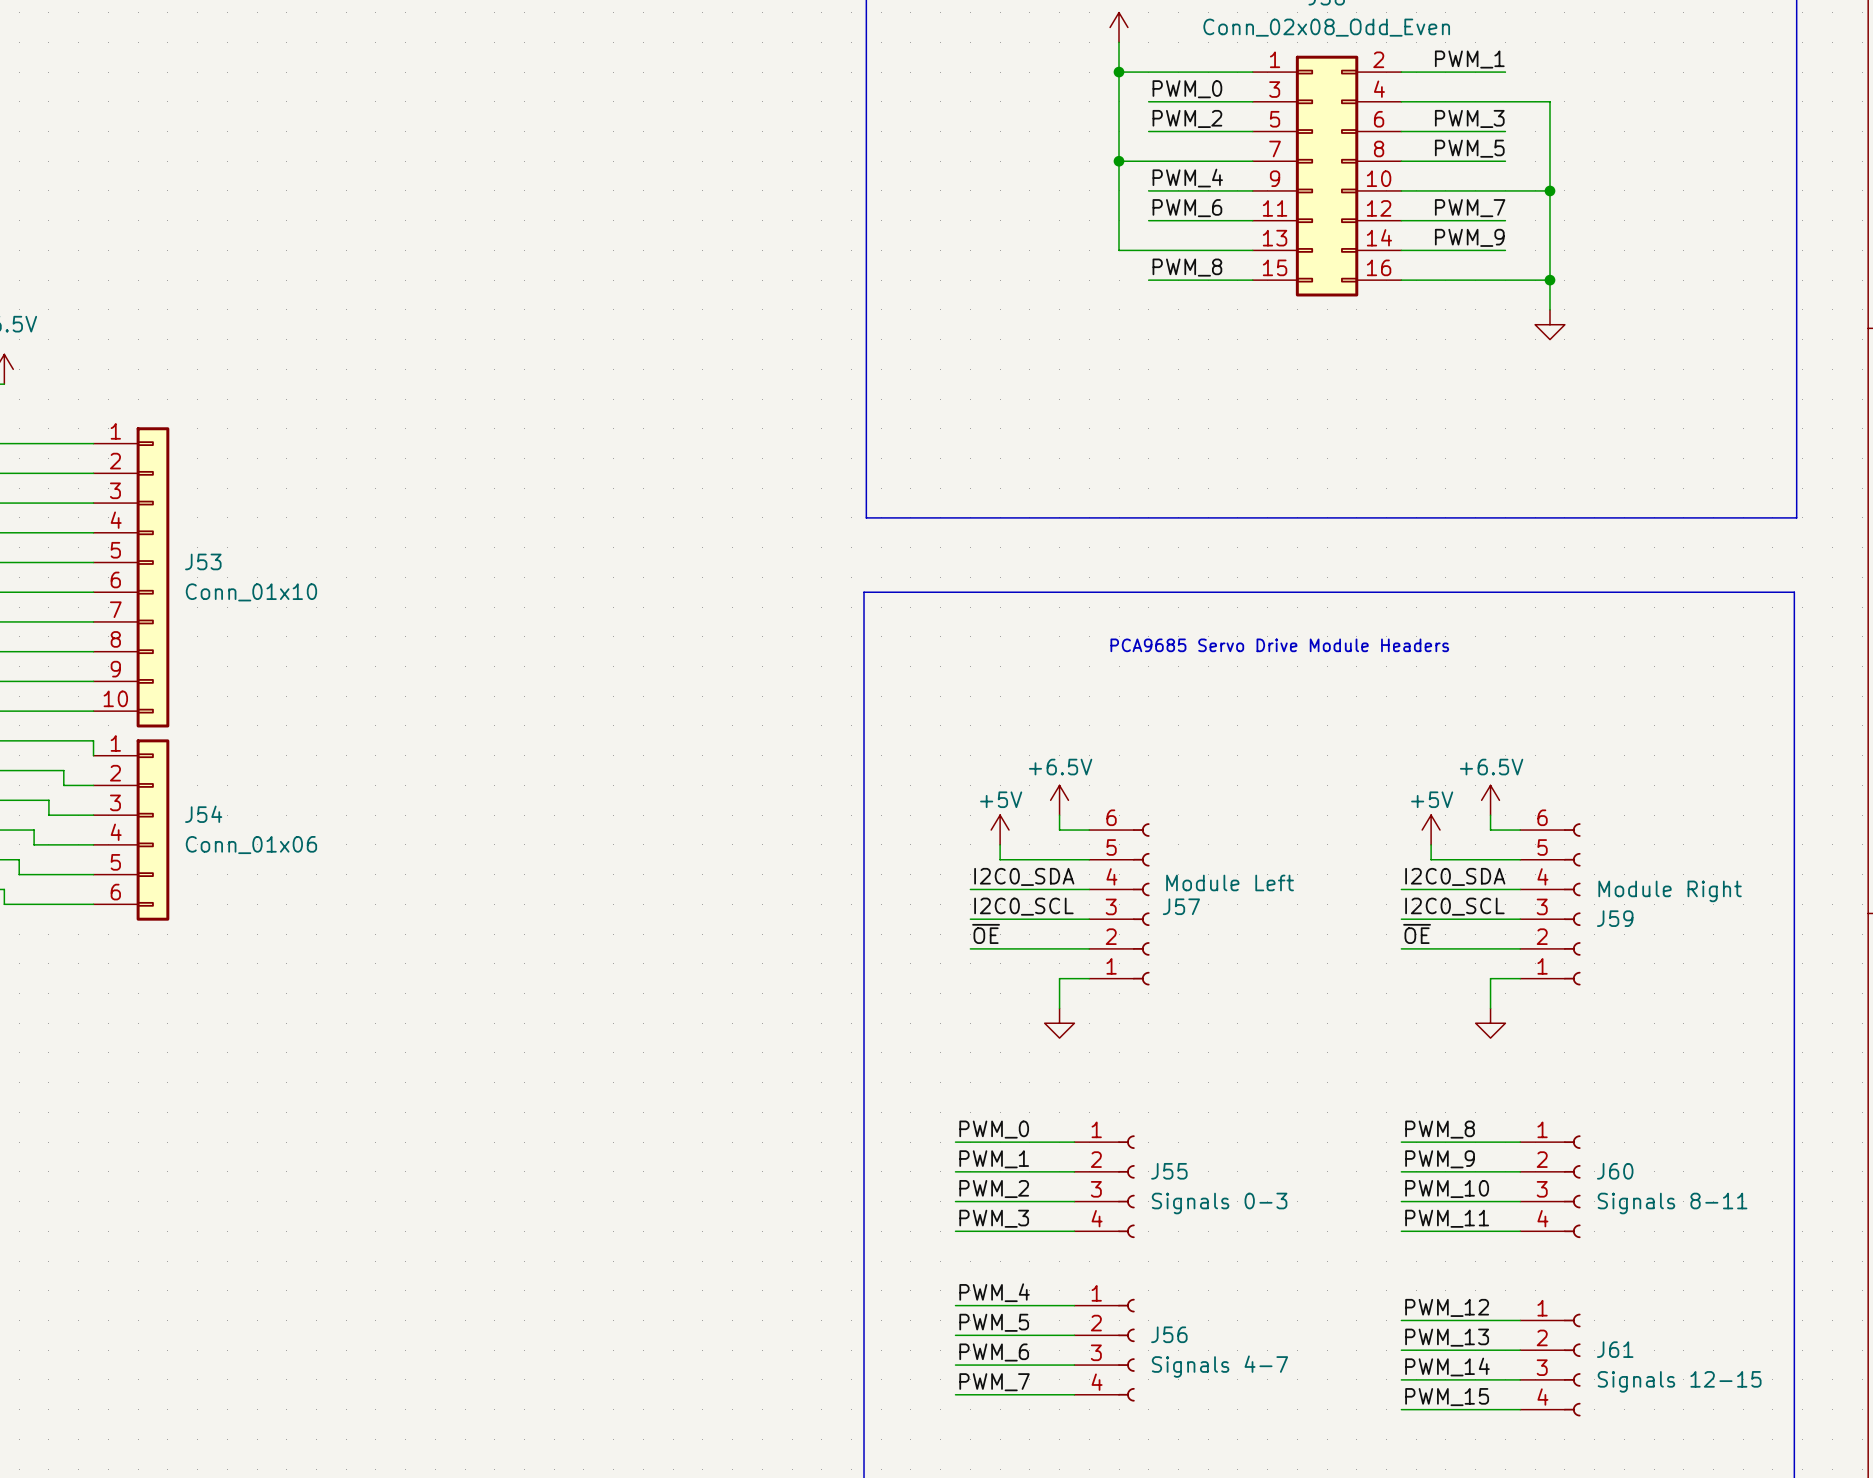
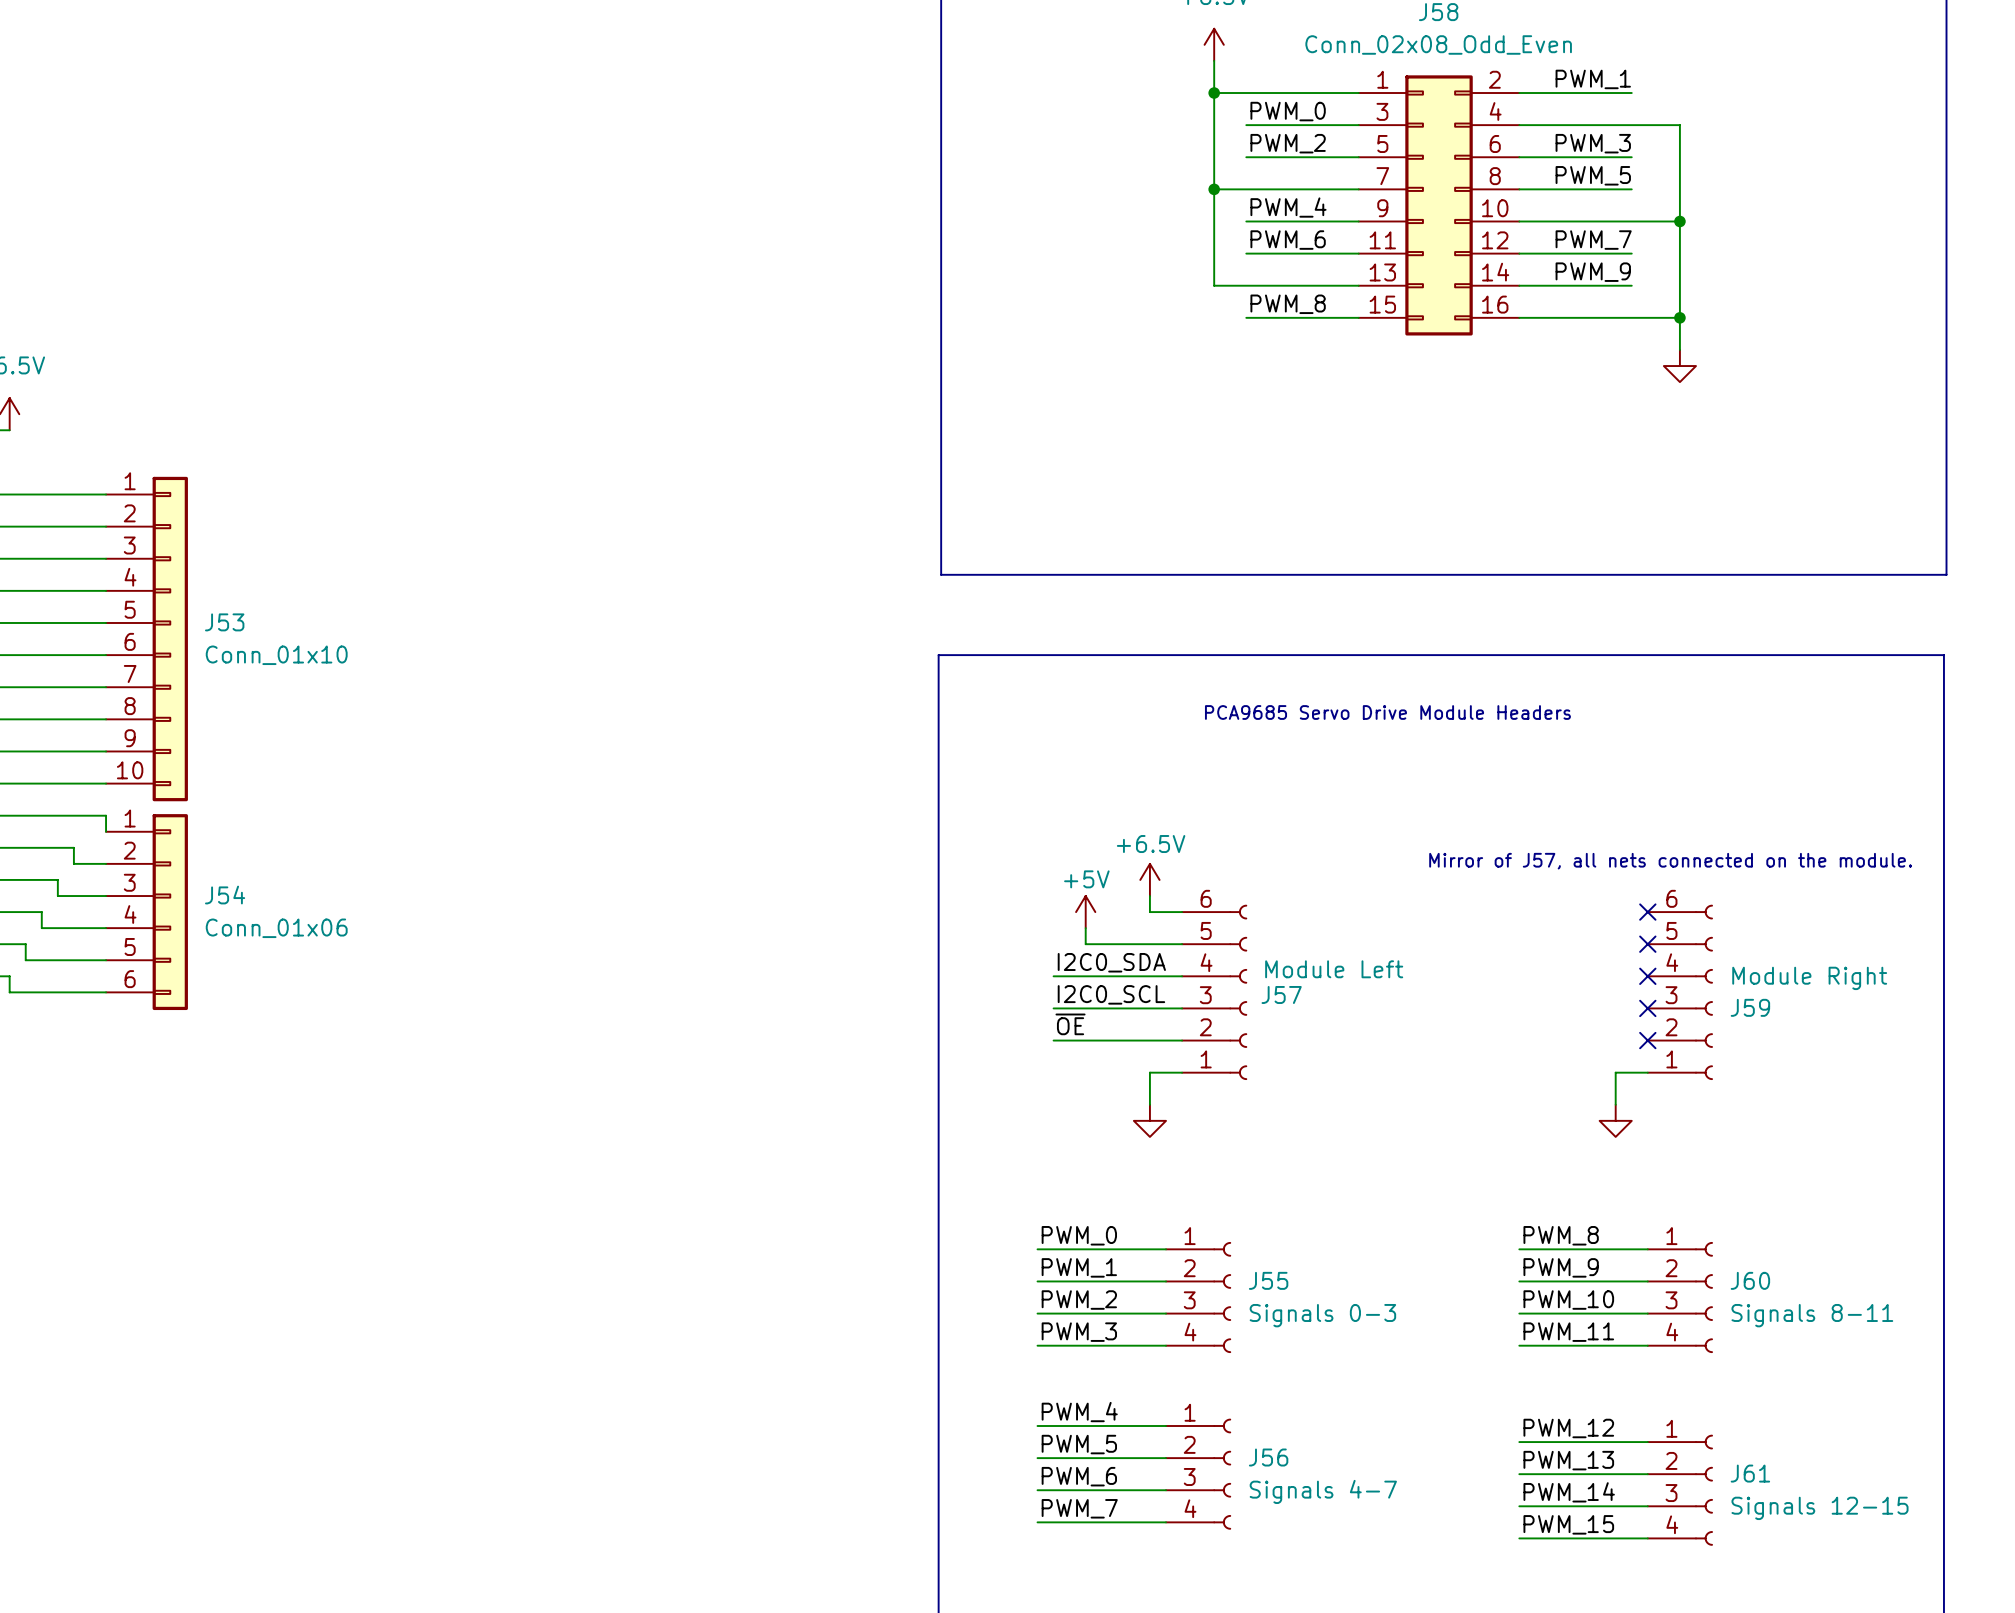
text: none -> Mirror of J57, all nets connected on the module. (1670, 861)
power symbol: +6.5V (1490, 800) -> none
wire: (1490, 815) (1490, 830) (1520, 830) -> none
power symbol: +5V (1431, 830) -> none
no-connect mark: none -> (1647, 912)
wire: (1431, 844) (1431, 859) (1520, 859) -> none
no-connect mark: none -> (1647, 944)
label: I2C0_SDA (1455, 876) -> none
wire: (1401, 889) (1520, 889) -> none
no-connect mark: none -> (1647, 976)
label: I2C0_SCL (1454, 906) -> none
wire: (1401, 919) (1520, 919) -> none
no-connect mark: none -> (1647, 1008)
label: ~{OE} (1417, 933) -> none
wire: (1401, 948) (1520, 948) -> none
no-connect mark: none -> (1647, 1040)

